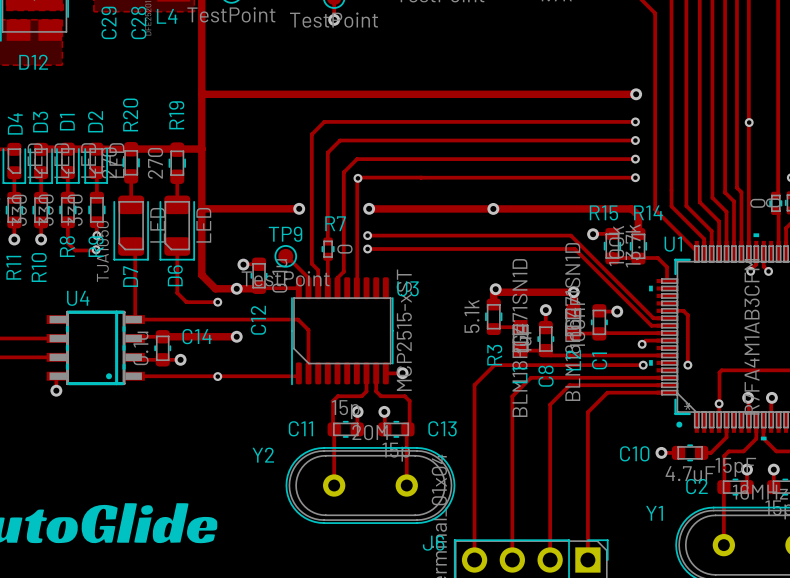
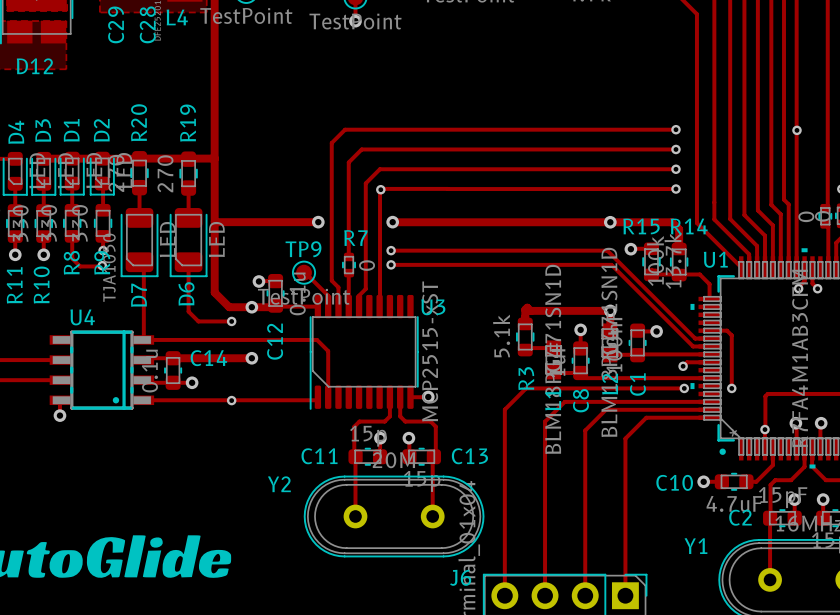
track: (201, 94) (636, 94) -> none
via: (636, 94) -> none
via: (493, 208) -> none
via: none -> (610, 222)
via: (495, 289) -> none

